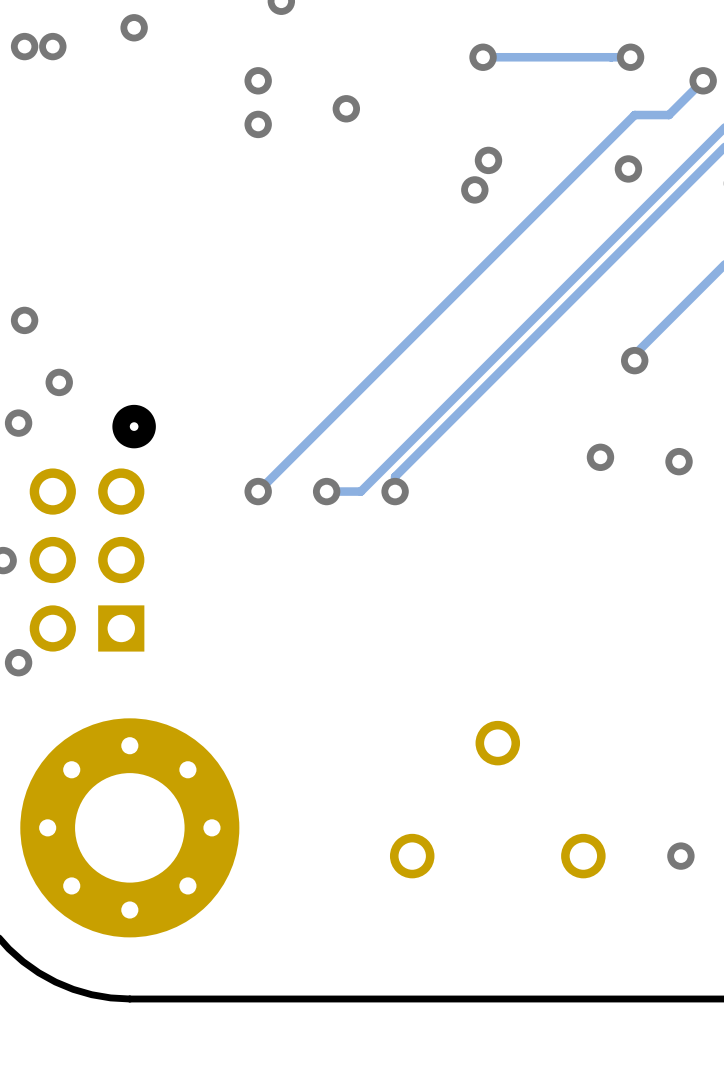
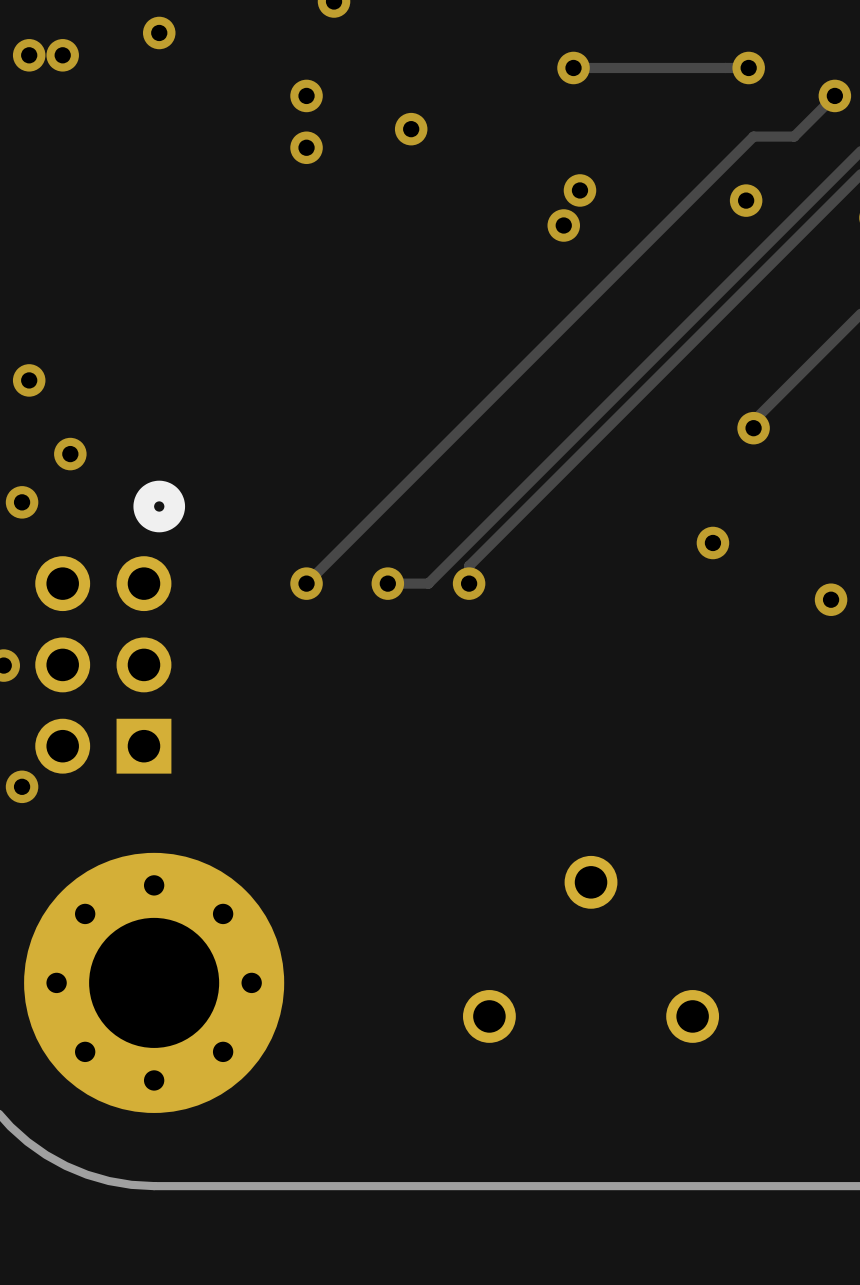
via position: (679, 461) -> (831, 599)
via: (680, 856) -> none

